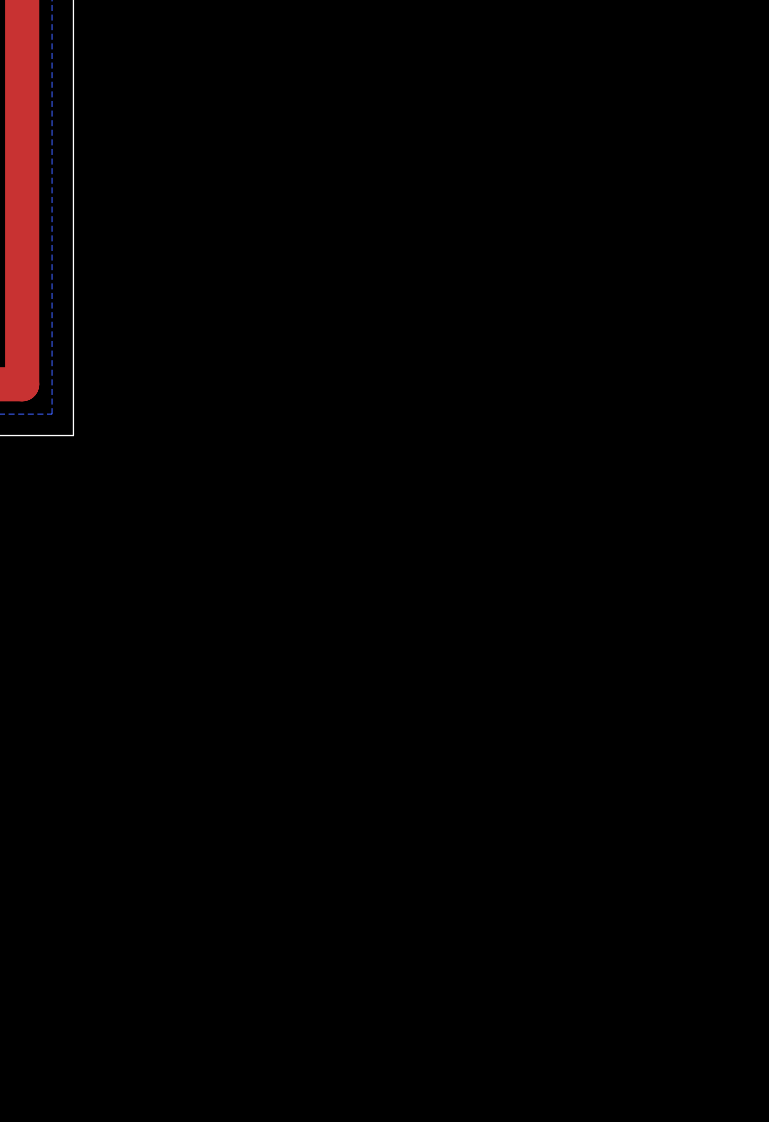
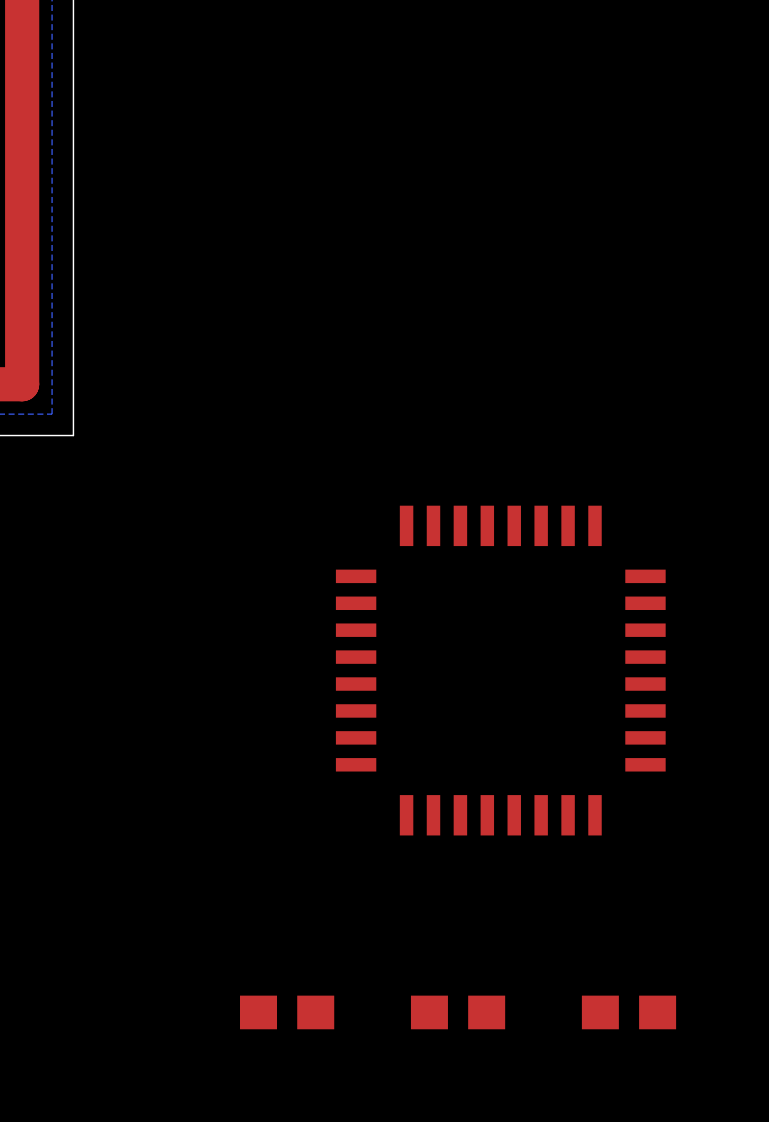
part: none -> (500, 670)
part: none -> (287, 1012)
part: none -> (458, 1012)
part: none -> (628, 1012)

